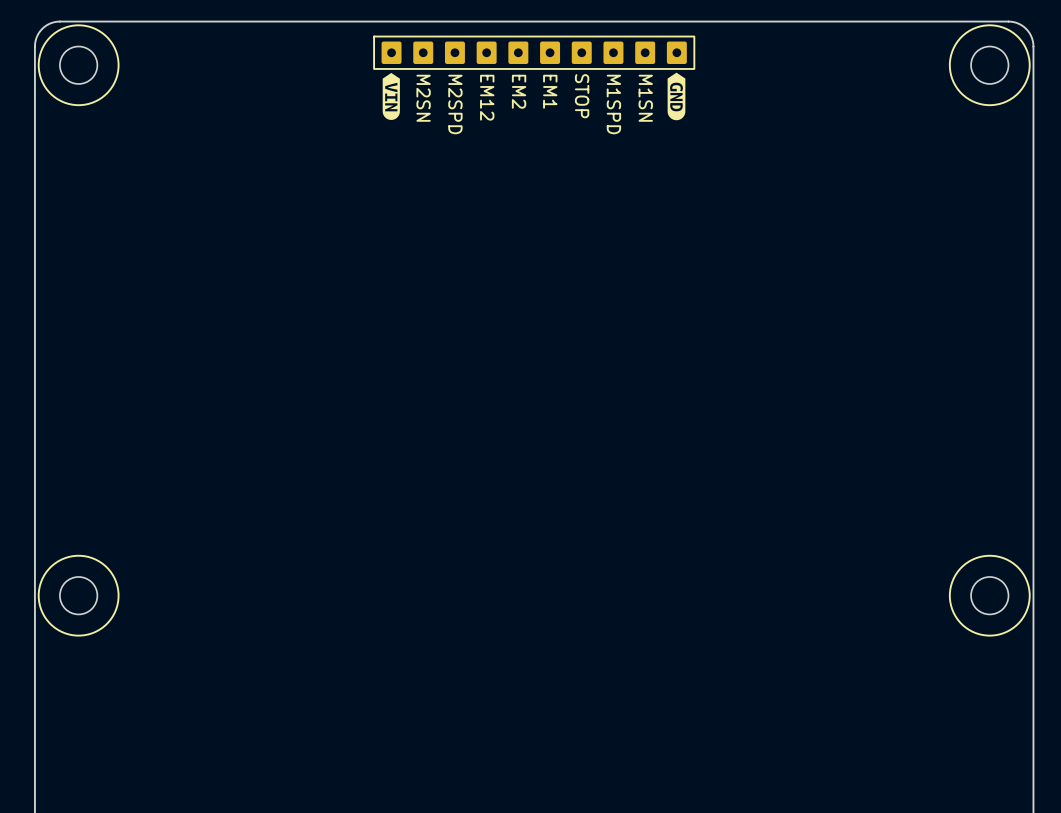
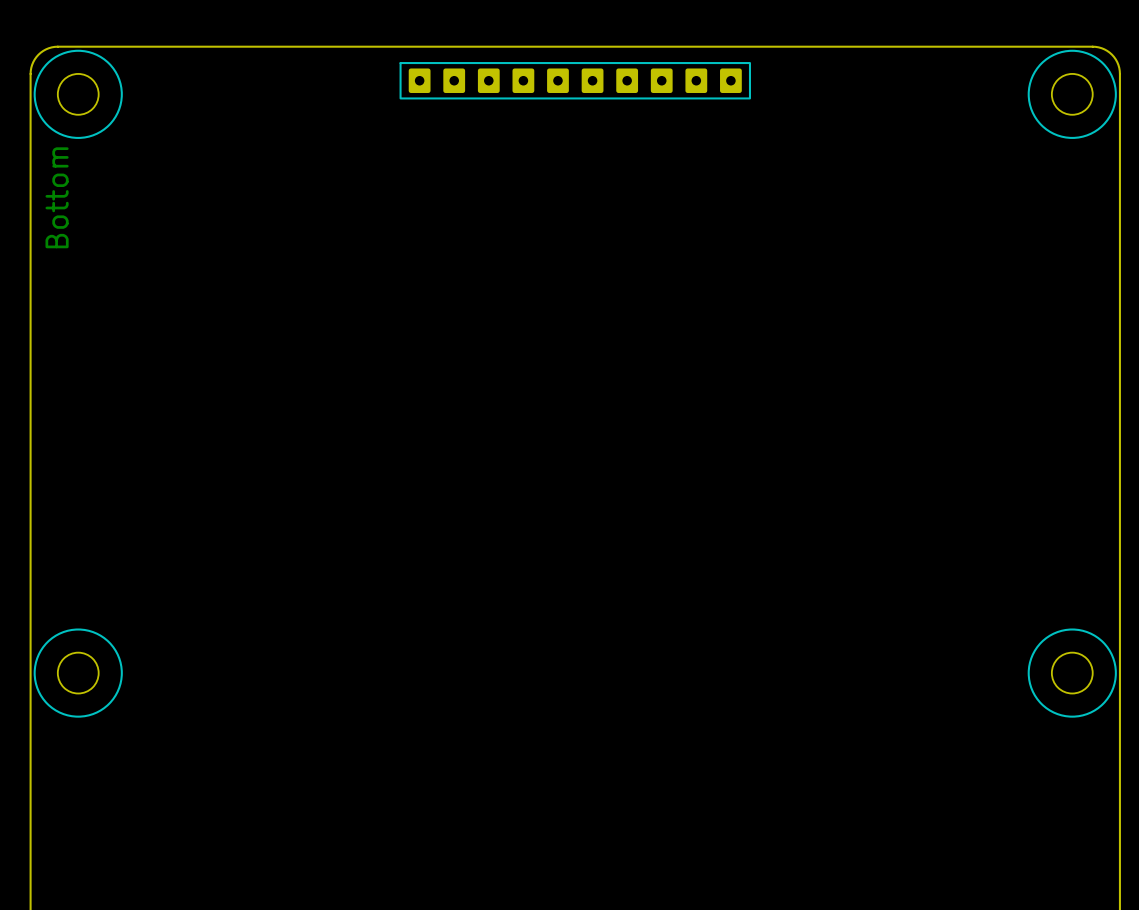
drawing: [382, 72, 400, 120] -> none
drawing: [667, 72, 686, 121] -> none
text: EM2 (519, 91) -> none
text: EM1 (550, 91) -> none
text: STOP (582, 96) -> none
text: EM12 (487, 97) -> none
text: M2SN (423, 98) -> none
text: M1SN (645, 98) -> none
text: M2SPD (455, 104) -> none
text: M1SPD (613, 104) -> none
text: none -> Bottom (57, 197)

